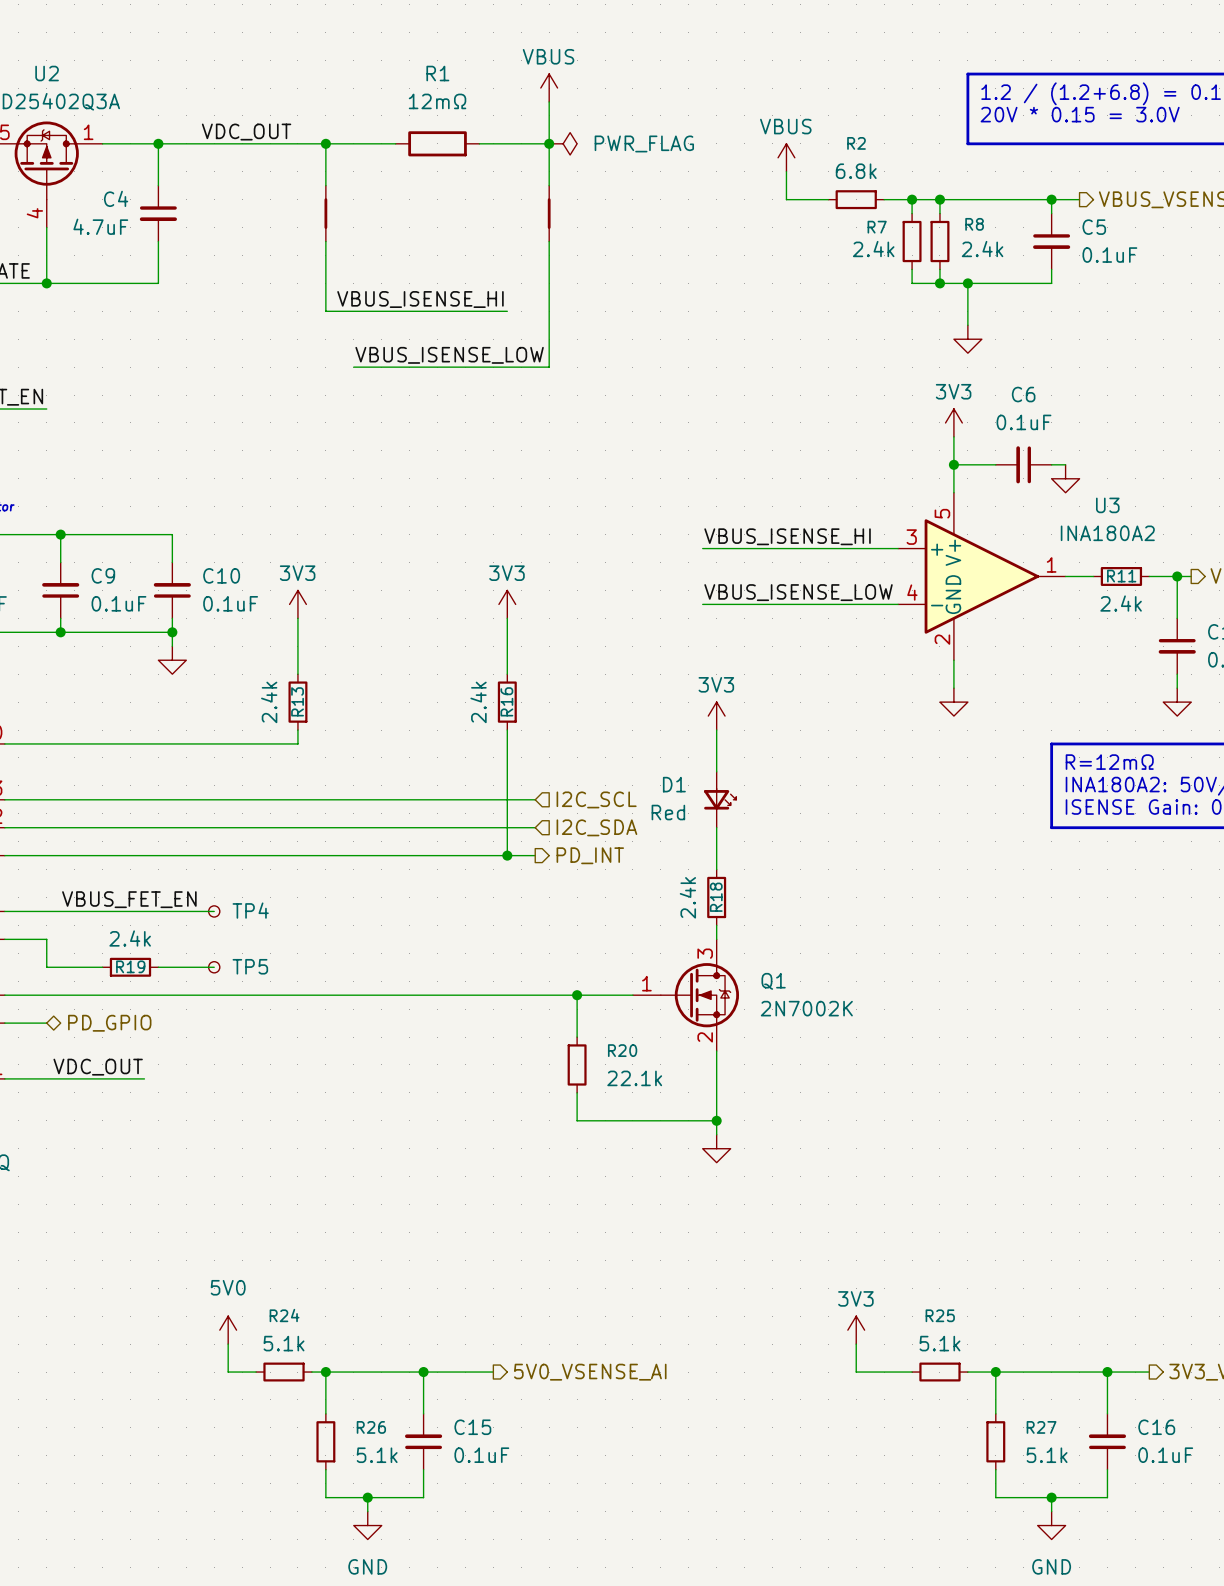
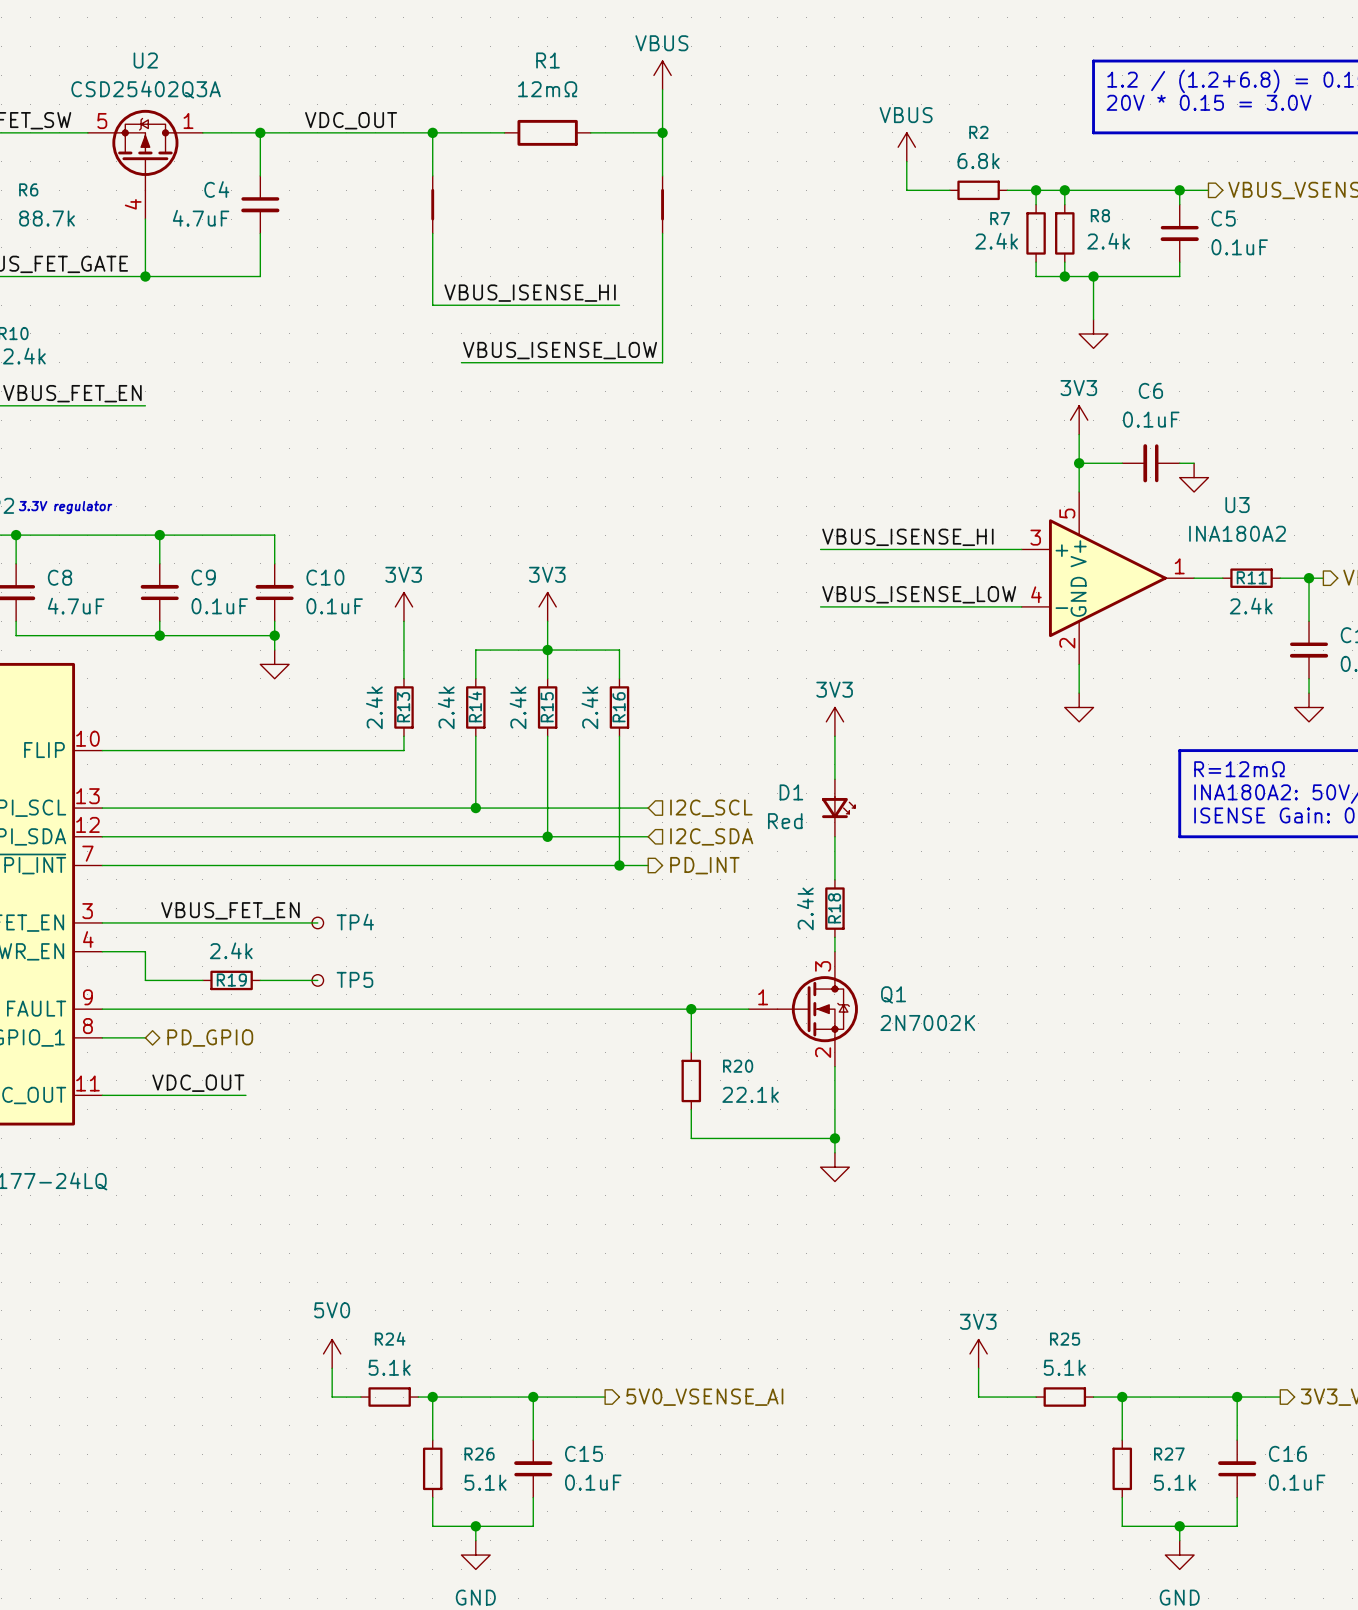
power symbol: PWR_FLAG (563, 143) -> none
power symbol position: 3V3 (507, 604) -> 3V3 (547, 606)
wire: none -> (547, 621) (547, 678)
wire: (507, 618) (507, 646) -> (475, 678) (475, 650) (619, 650)
junction: none -> (547, 650)
R14: none -> 2.4k (475, 707)
R15: none -> 2.4k (547, 707)
wire: none -> (475, 736) (475, 808)
wire: none -> (547, 736) (547, 836)
junction: none -> (475, 808)
junction: none -> (547, 836)

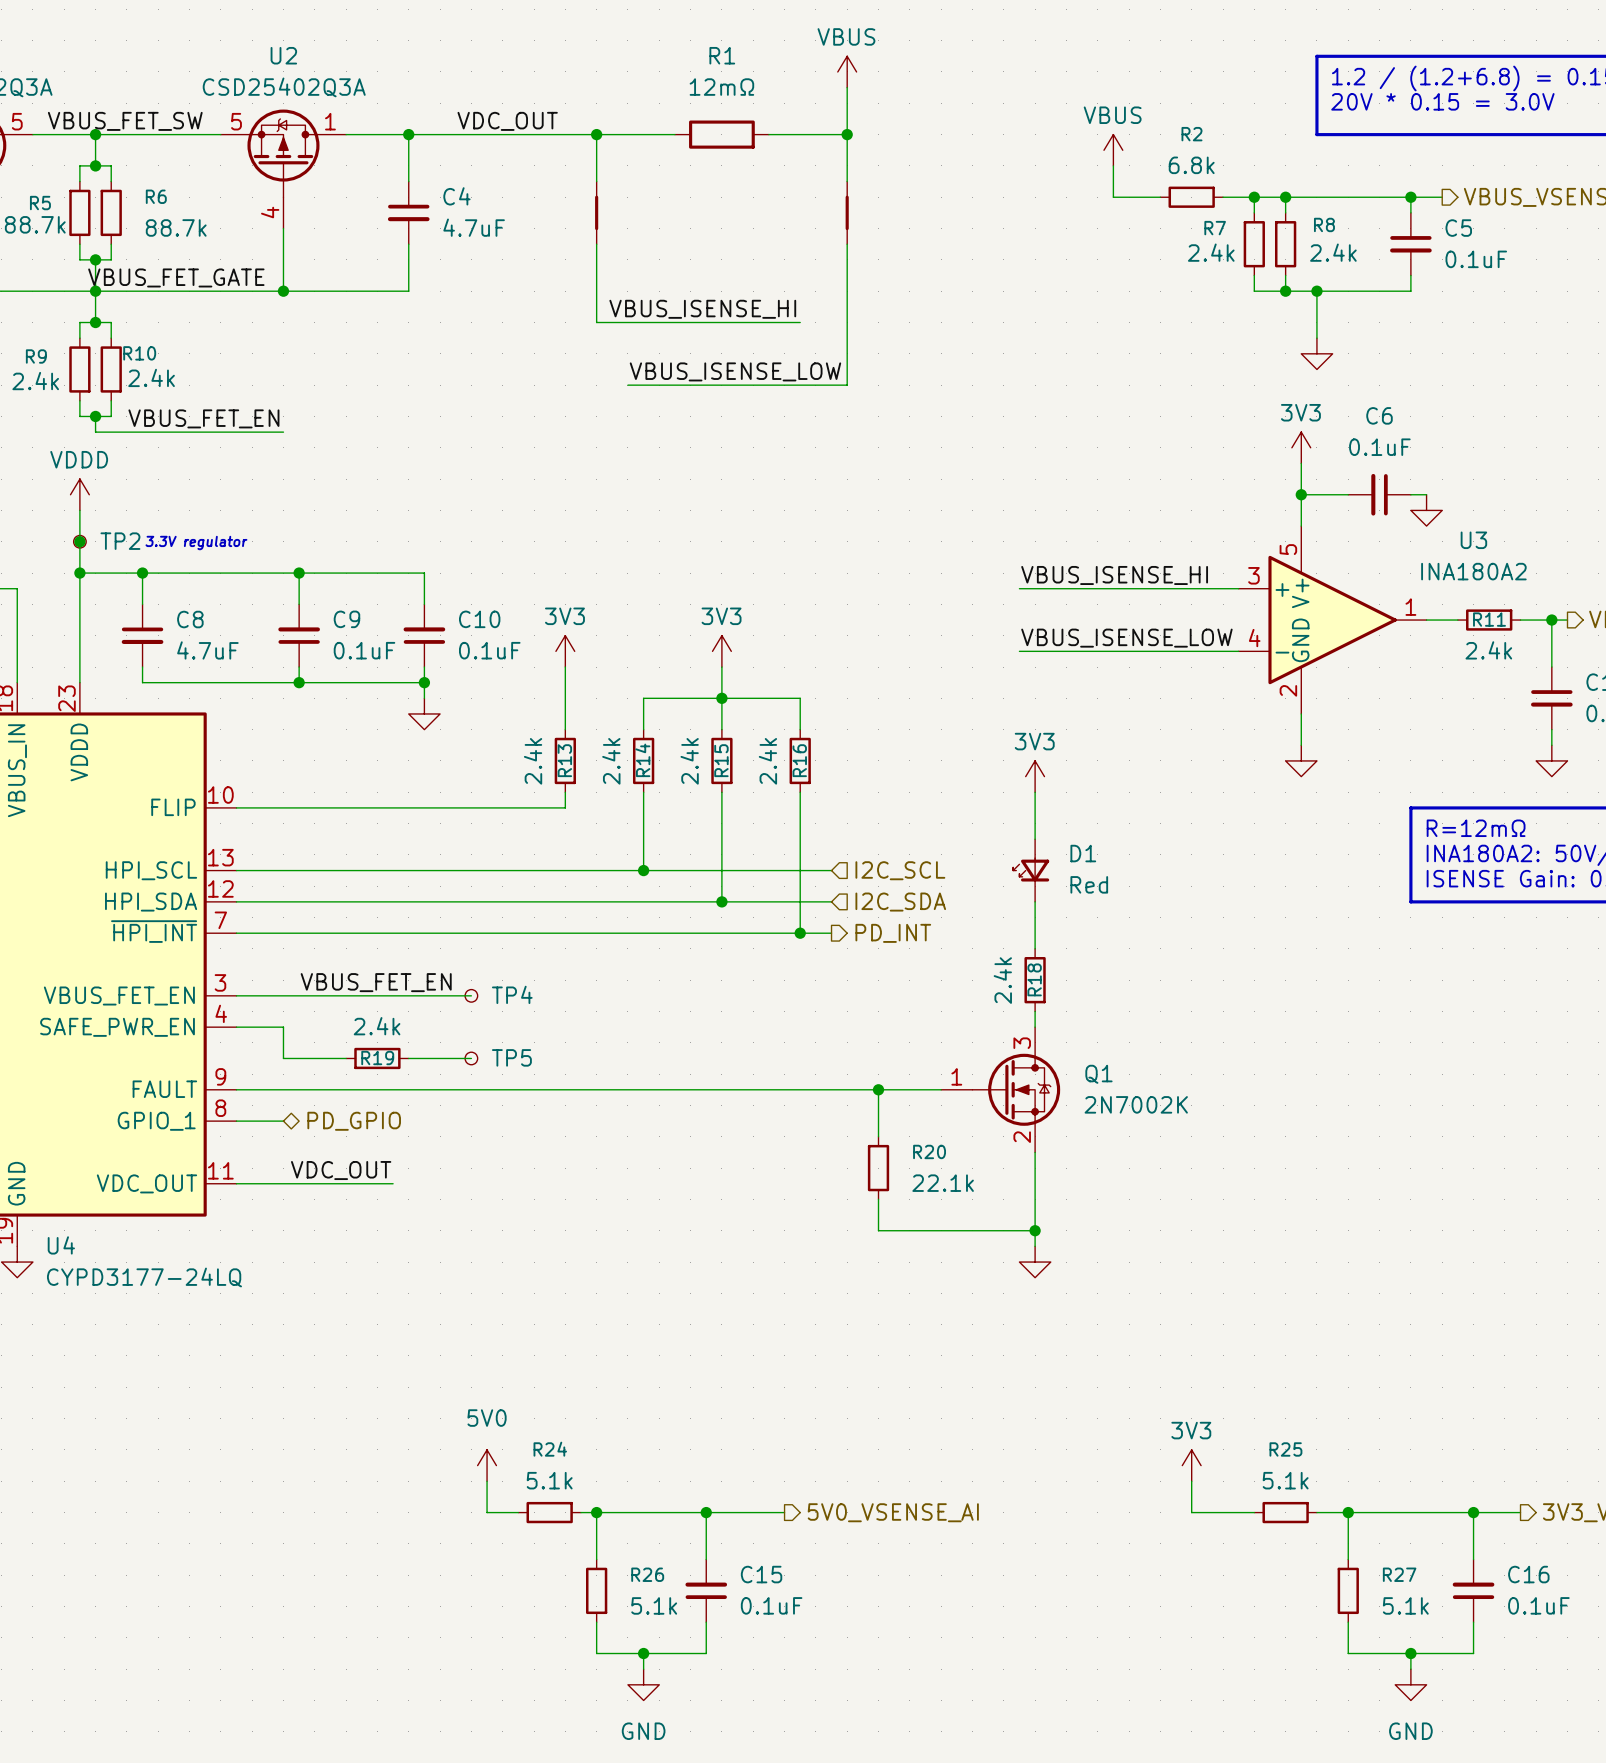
C4 name position: C4 (216, 189) -> C4 (456, 196)
C4 value position: 4.7uF (201, 218) -> 4.7uF (474, 227)
D1 flip: as is (838, 807) -> left-right (1031, 869)

